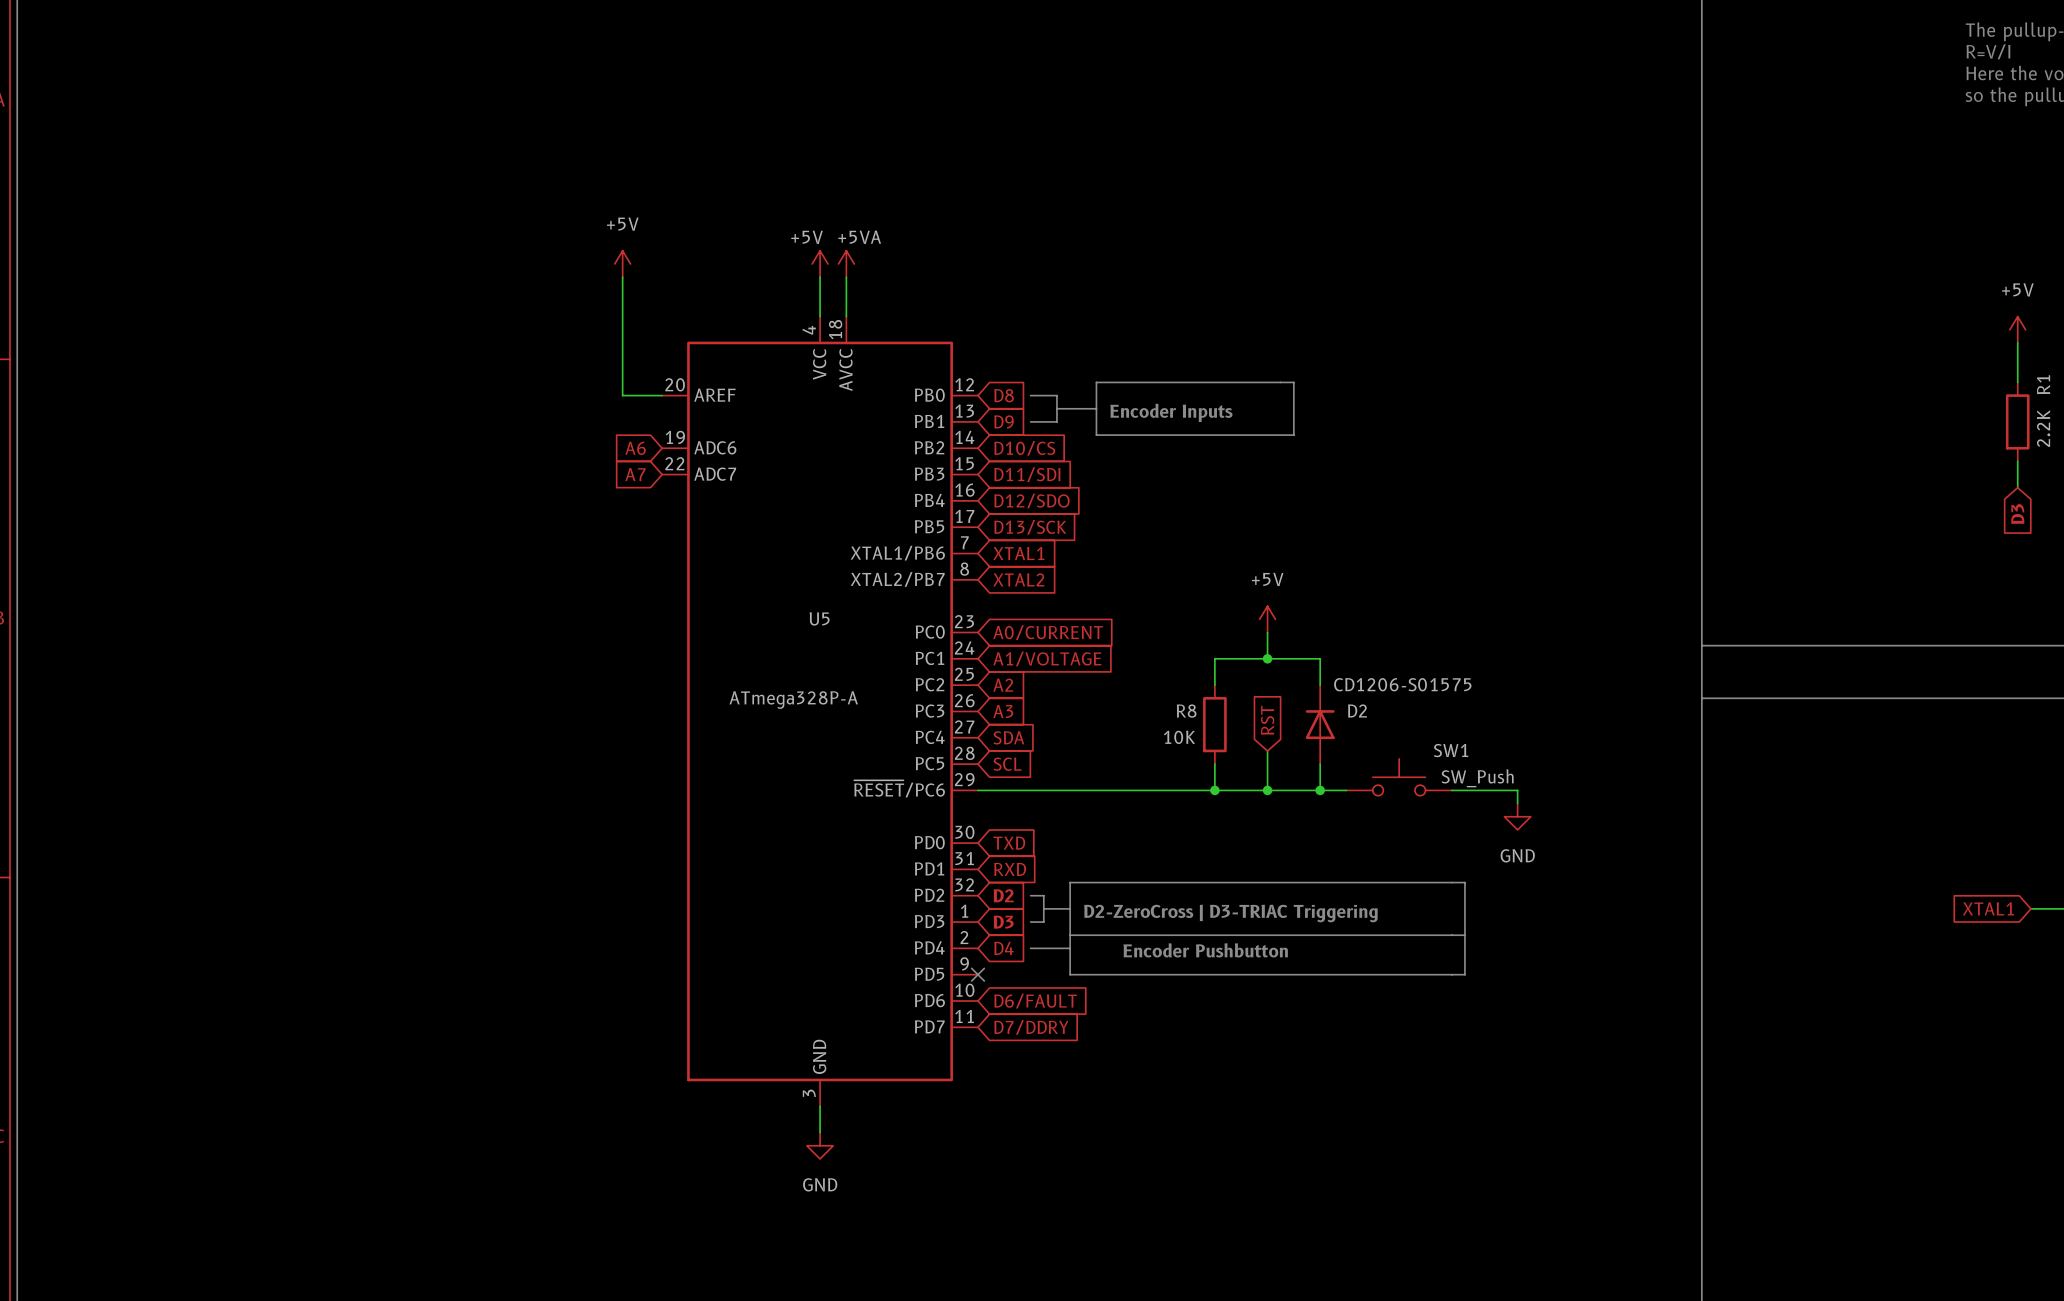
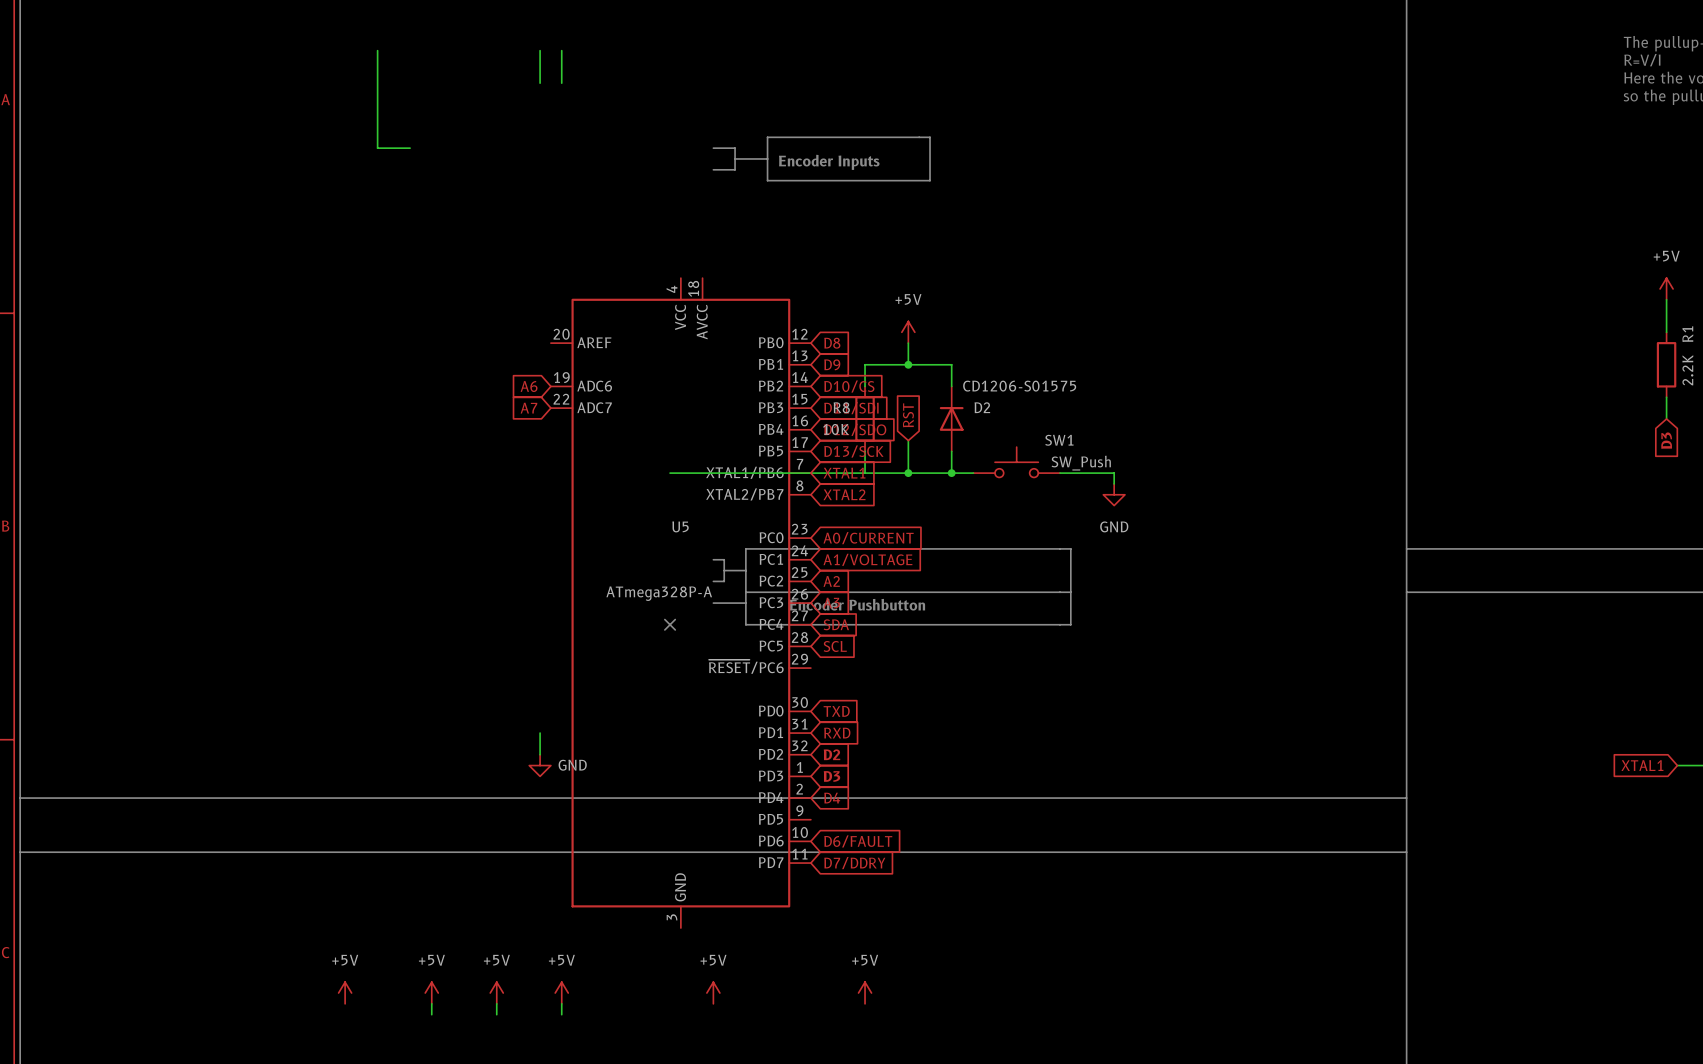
wire: none -> (377, 50) (377, 148) (410, 148)
wire: none -> (540, 50) (540, 83)
wire: none -> (561, 50) (561, 83)
line: none -> (767, 137) (767, 180) (930, 180) (930, 137) (767, 137)
line: none -> (713, 148) (735, 148) (735, 169) (713, 169)
line: none -> (735, 158) (767, 158)
text: none -> Encoder Inputs (829, 162)
power symbol: +5V (622, 263) -> none
power symbol: +5V (820, 263) -> none
power symbol: +5VA (846, 263) -> none
wire: (622, 277) (622, 395) (662, 395) -> none
wire: (820, 277) (820, 316) -> none
wire: (846, 277) (846, 316) -> none
line: (1096, 382) (1096, 435) (1293, 435) (1293, 382) (1096, 382) -> none
power symbol: none -> +5V (908, 332)
line: (1030, 395) (1056, 395) (1056, 421) (1030, 421) -> none
line: (1056, 408) (1096, 408) -> none
text: Encoder Inputs (1171, 412) -> none
junction: none -> (908, 364)
wire: none -> (865, 386) (865, 364) (951, 364) (951, 386)
global label: none -> RST (908, 415)
wire: none -> (908, 440) (908, 473)
wire: none -> (865, 451) (865, 473)
wire: none -> (670, 473) (973, 473)
junction: none -> (908, 473)
junction: none -> (951, 473)
wire: none -> (1060, 473) (1114, 473) (1114, 483)
power symbol: none -> GND (1114, 494)
power symbol: +5V (1267, 619) -> none
wire: (1267, 632) (1267, 658) -> (951, 451) (951, 473)
line: none -> (745, 548) (1070, 548) (1070, 624) (745, 624) (745, 548)
line: none -> (713, 559) (724, 559) (724, 581) (713, 581)
junction: (1267, 658) -> none
line: none -> (724, 570) (745, 570)
wire: (1214, 685) (1214, 658) (1320, 658) (1320, 685) -> none
line: none -> (745, 592) (1070, 592)
line: none -> (713, 603) (745, 603)
text: none -> Encoder Pushbutton (857, 604)
global label: RST (1267, 720) -> none
R8 position: (1214, 724) -> (865, 418)
D2 position: (1320, 724) -> (951, 418)
no-connect mark: none -> (670, 624)
wire: (1267, 750) (1267, 790) -> none
wire: (1214, 764) (1214, 790) -> none
wire: (1320, 764) (1320, 790) -> none
SW1 position: (1399, 777) -> (1016, 462)
wire: (977, 790) (1346, 790) -> none
junction: (1214, 790) -> none
junction: (1267, 790) -> none
junction: (1320, 790) -> none
wire: (1451, 790) (1517, 790) (1517, 803) -> none
power symbol: GND (1517, 816) -> none
wire: none -> (540, 733) (540, 754)
line: (1070, 882) (1464, 882) (1464, 974) (1070, 974) (1070, 882) -> none
line: (1030, 895) (1043, 895) (1043, 922) (1030, 922) -> none
power symbol: none -> GND (540, 765)
line: (1043, 908) (1070, 908) -> none
text: D2-ZeroCross | D3-TRIAC Triggering (1230, 913) -> none
line: (1070, 935) (1464, 935) -> none
line: none -> (20, 798) (854, 798)
line: none -> (886, 798) (1406, 798)
text: Encoder Pushbutton (1205, 950) -> none
no-connect mark: (977, 974) -> none
line: none -> (20, 852) (1406, 852)
wire: (820, 1106) (820, 1132) -> none
power symbol: GND (820, 1145) -> none
power symbol: none -> +5V (345, 993)
power symbol: none -> +5V (431, 993)
power symbol: none -> +5V (496, 993)
power symbol: none -> +5V (561, 993)
power symbol: none -> +5V (713, 993)
power symbol: none -> +5V (865, 993)
wire: none -> (431, 1003) (431, 1014)
wire: none -> (496, 1003) (496, 1014)
wire: none -> (561, 1003) (561, 1014)

